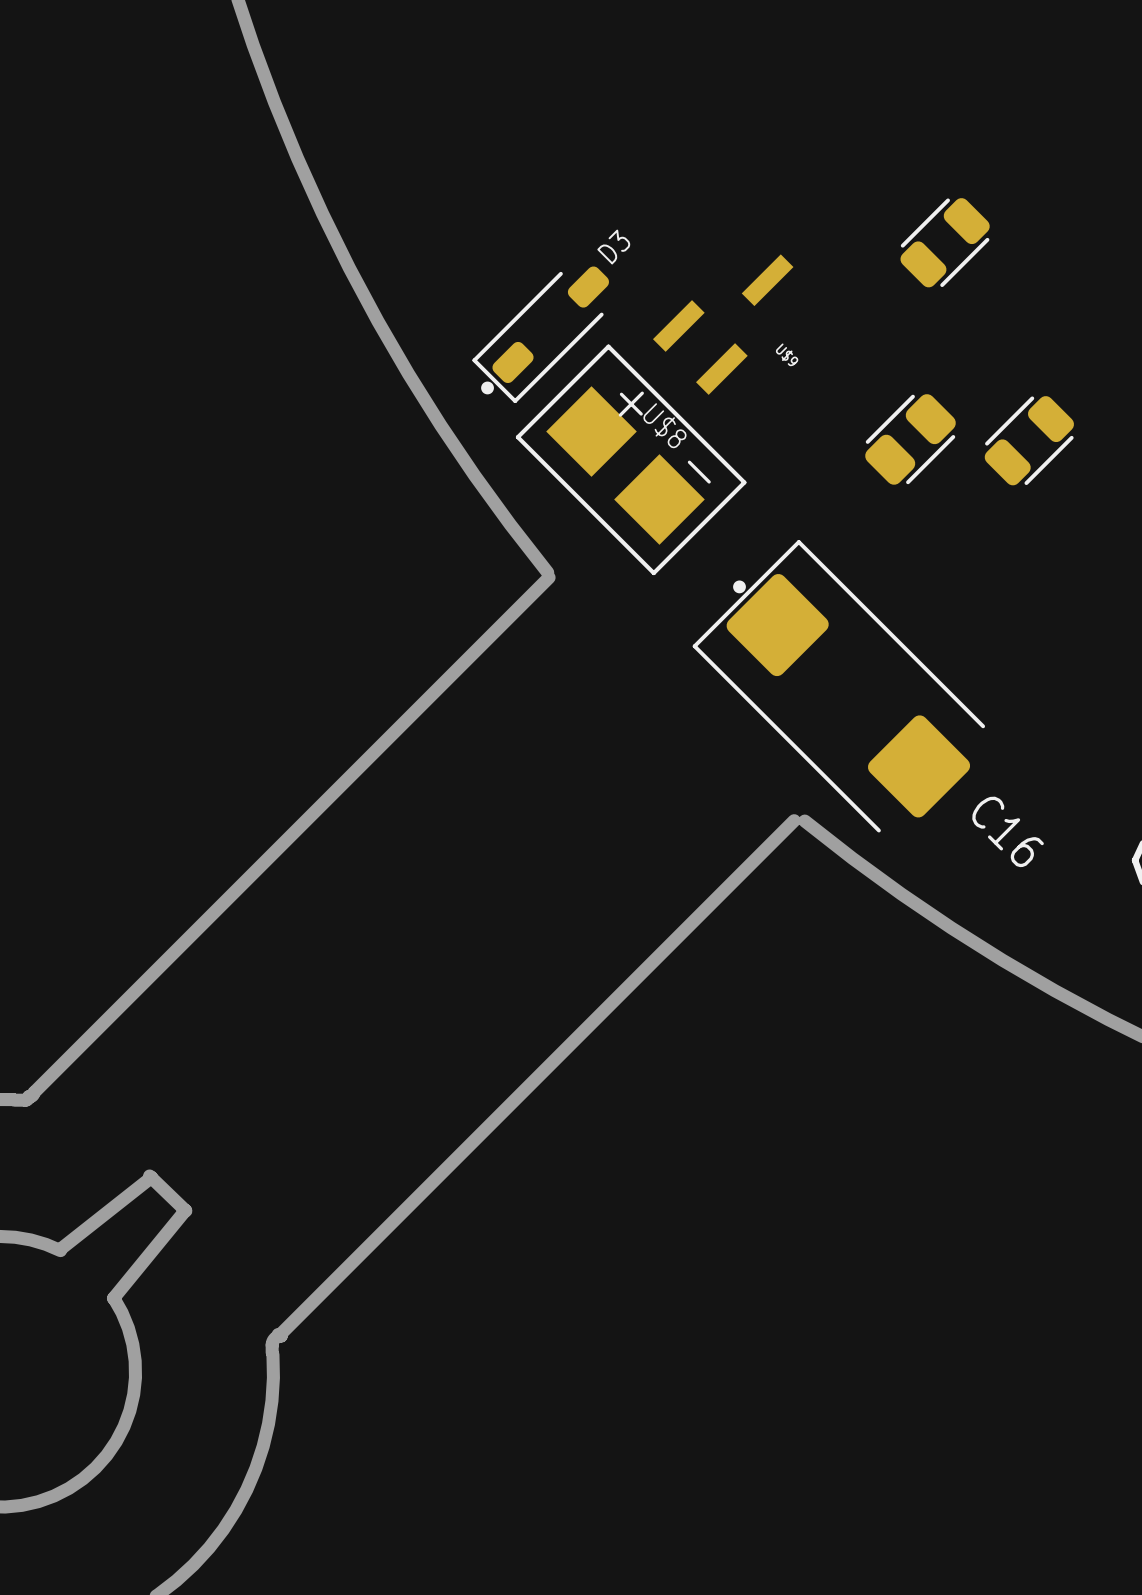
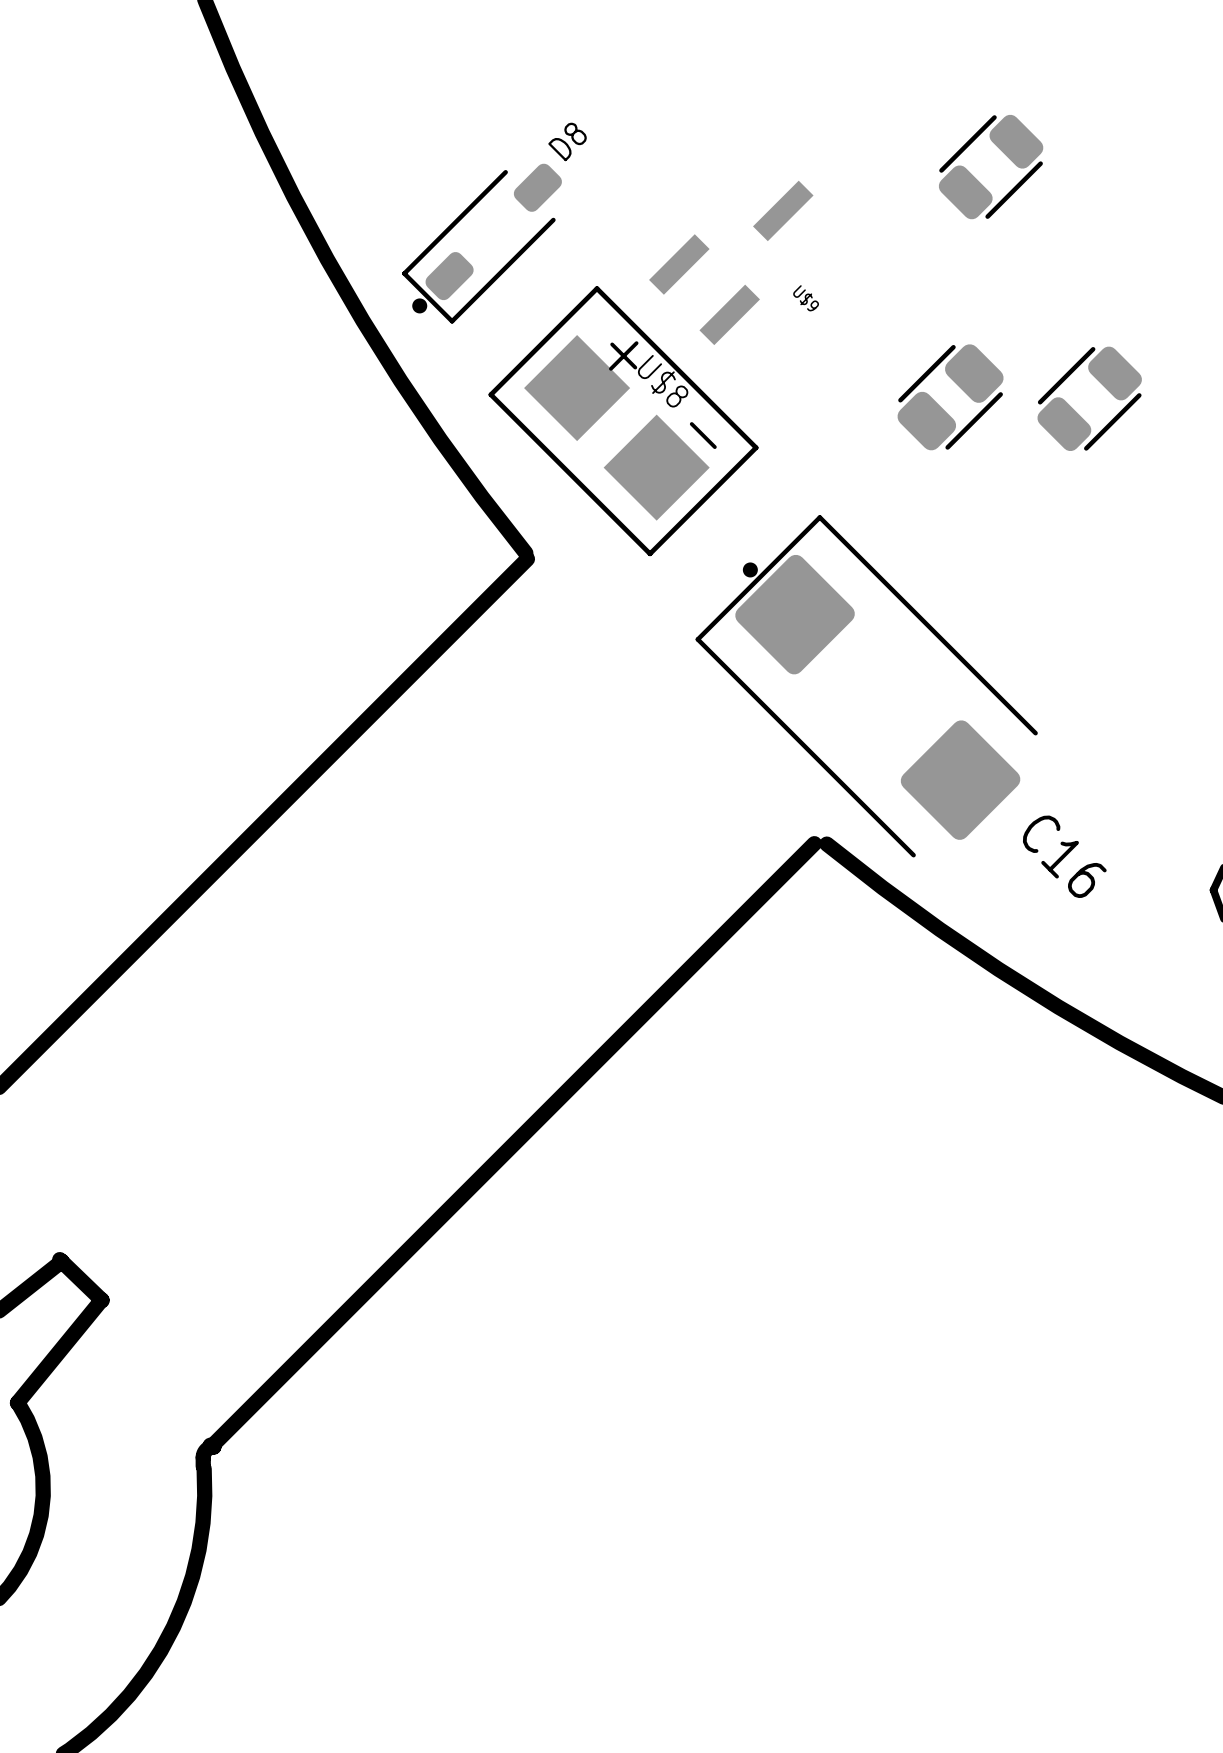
D8: none -> (482, 243)
D3: (540, 334) -> none

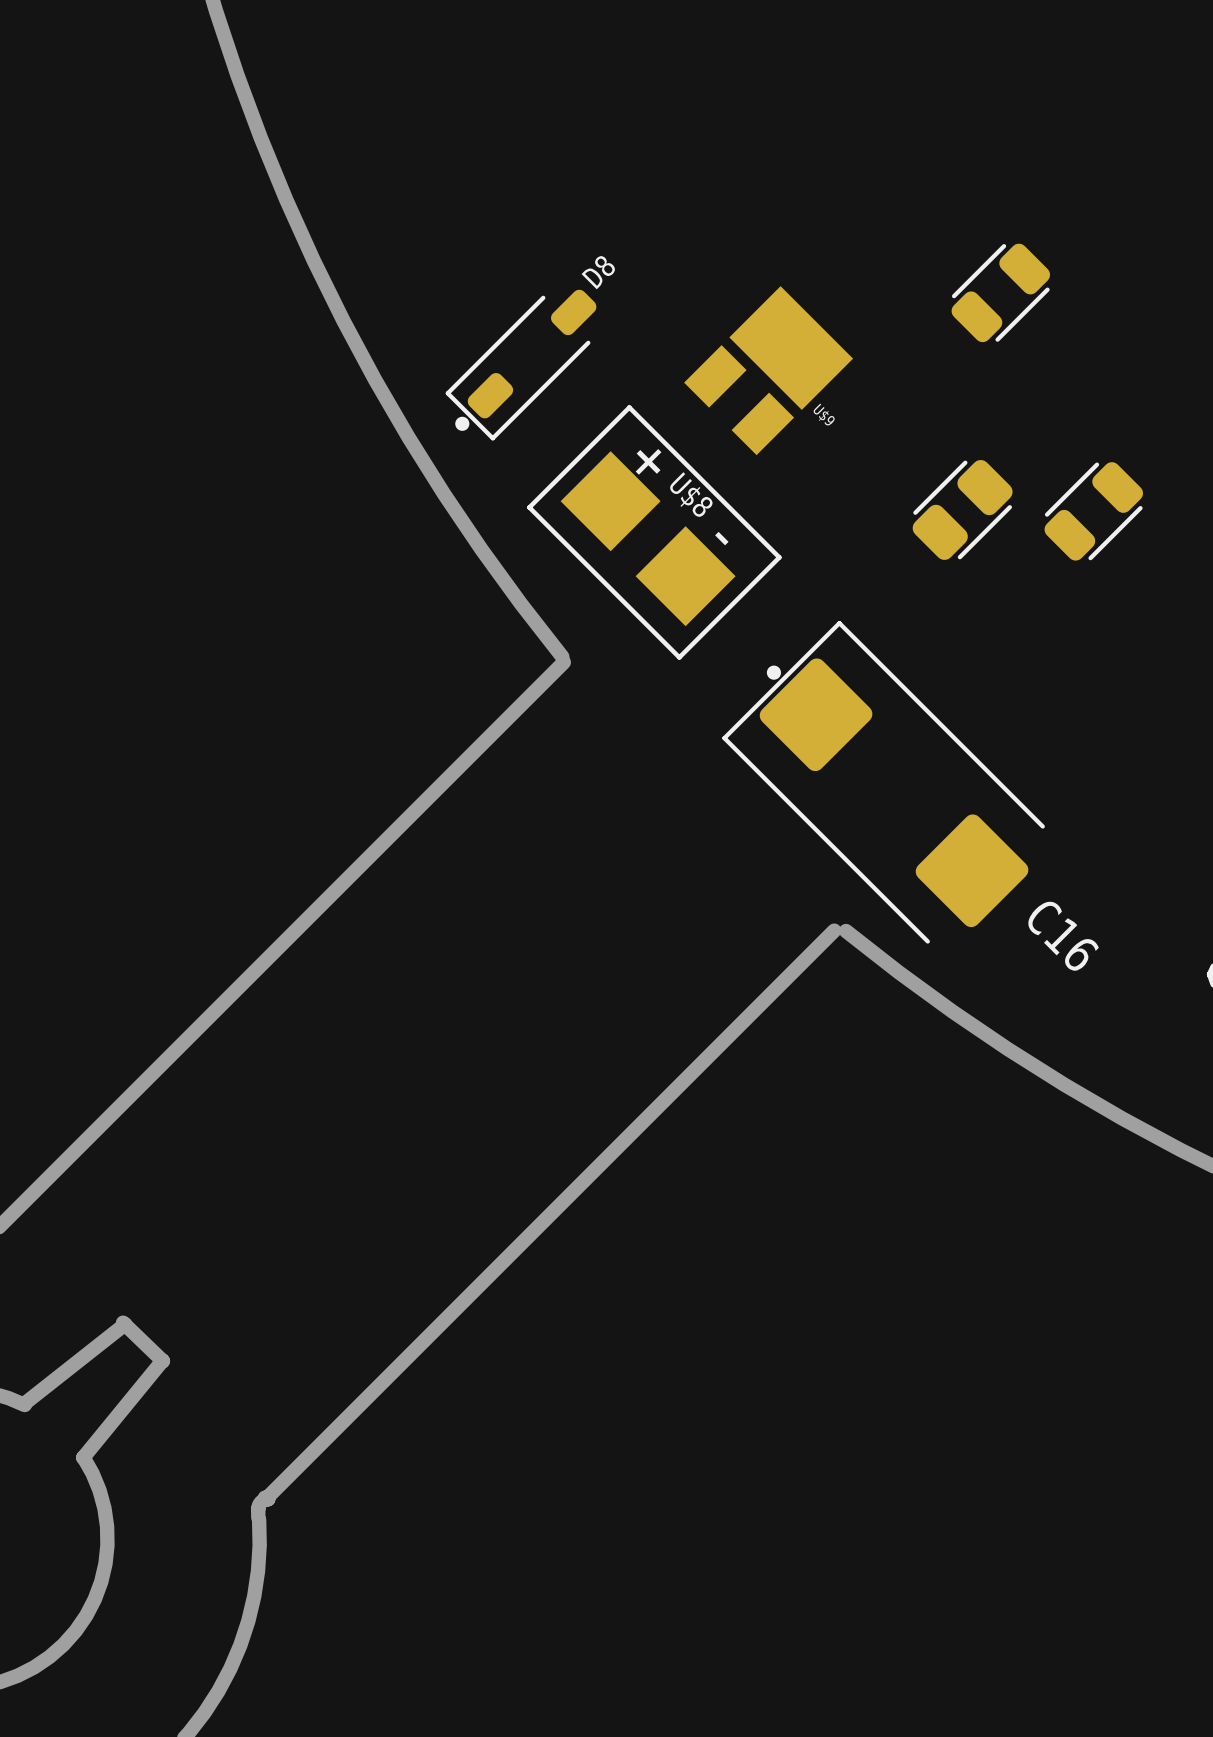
U$9 footprint: [649, 180, 814, 346] -> [684, 286, 854, 456]

